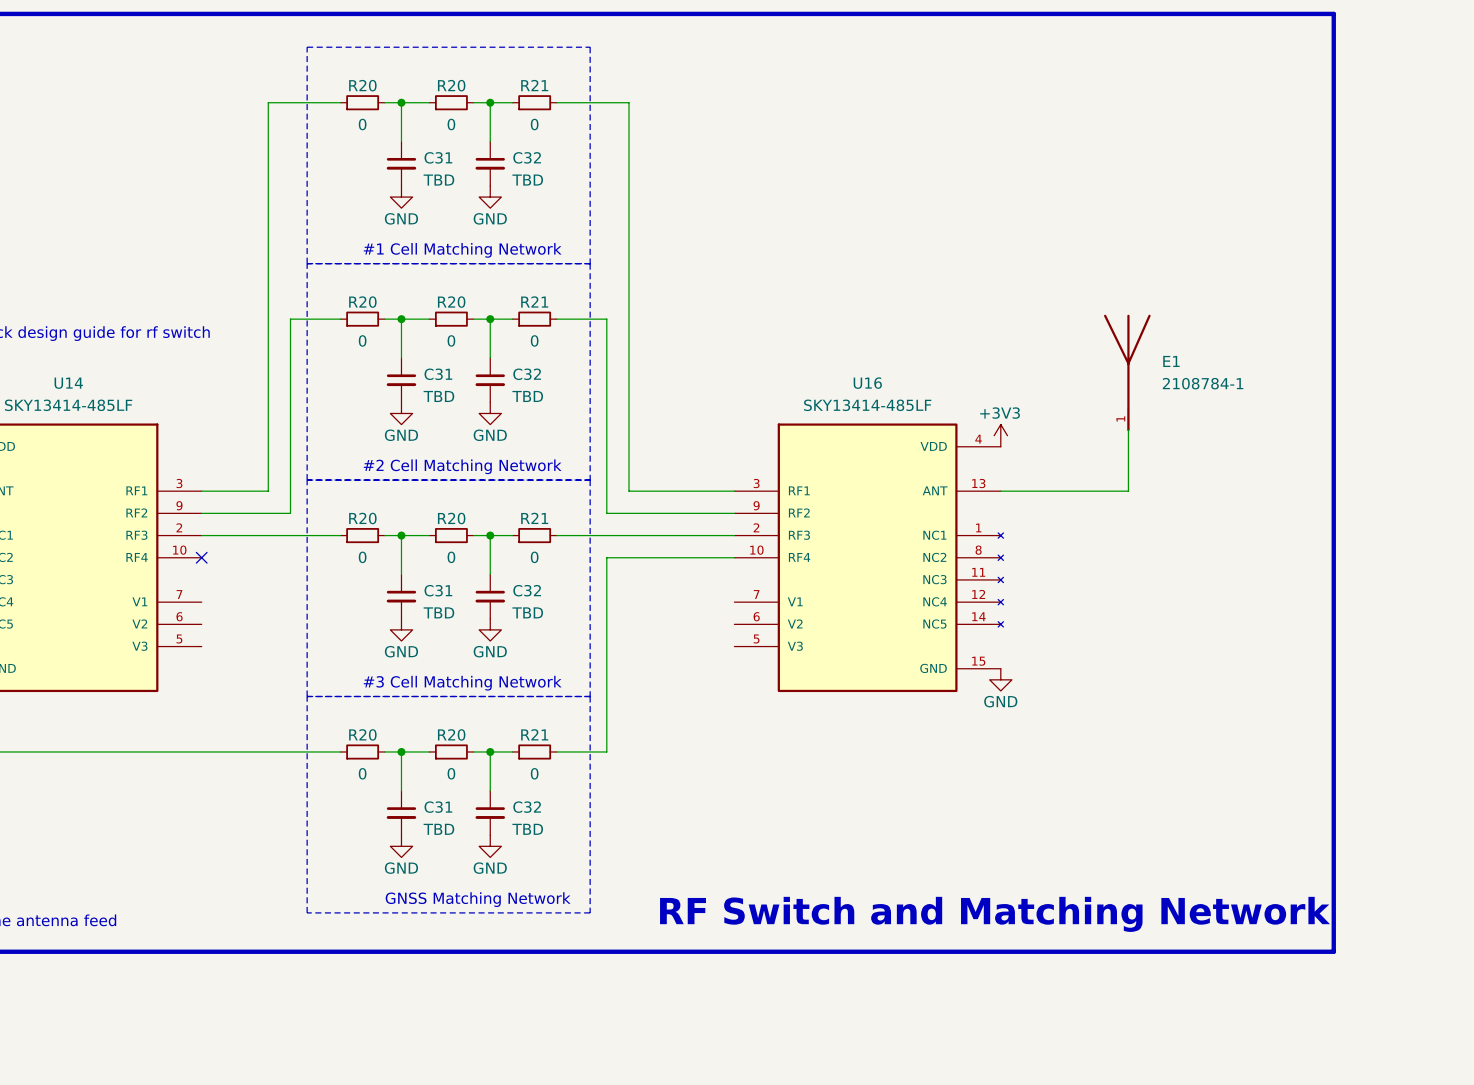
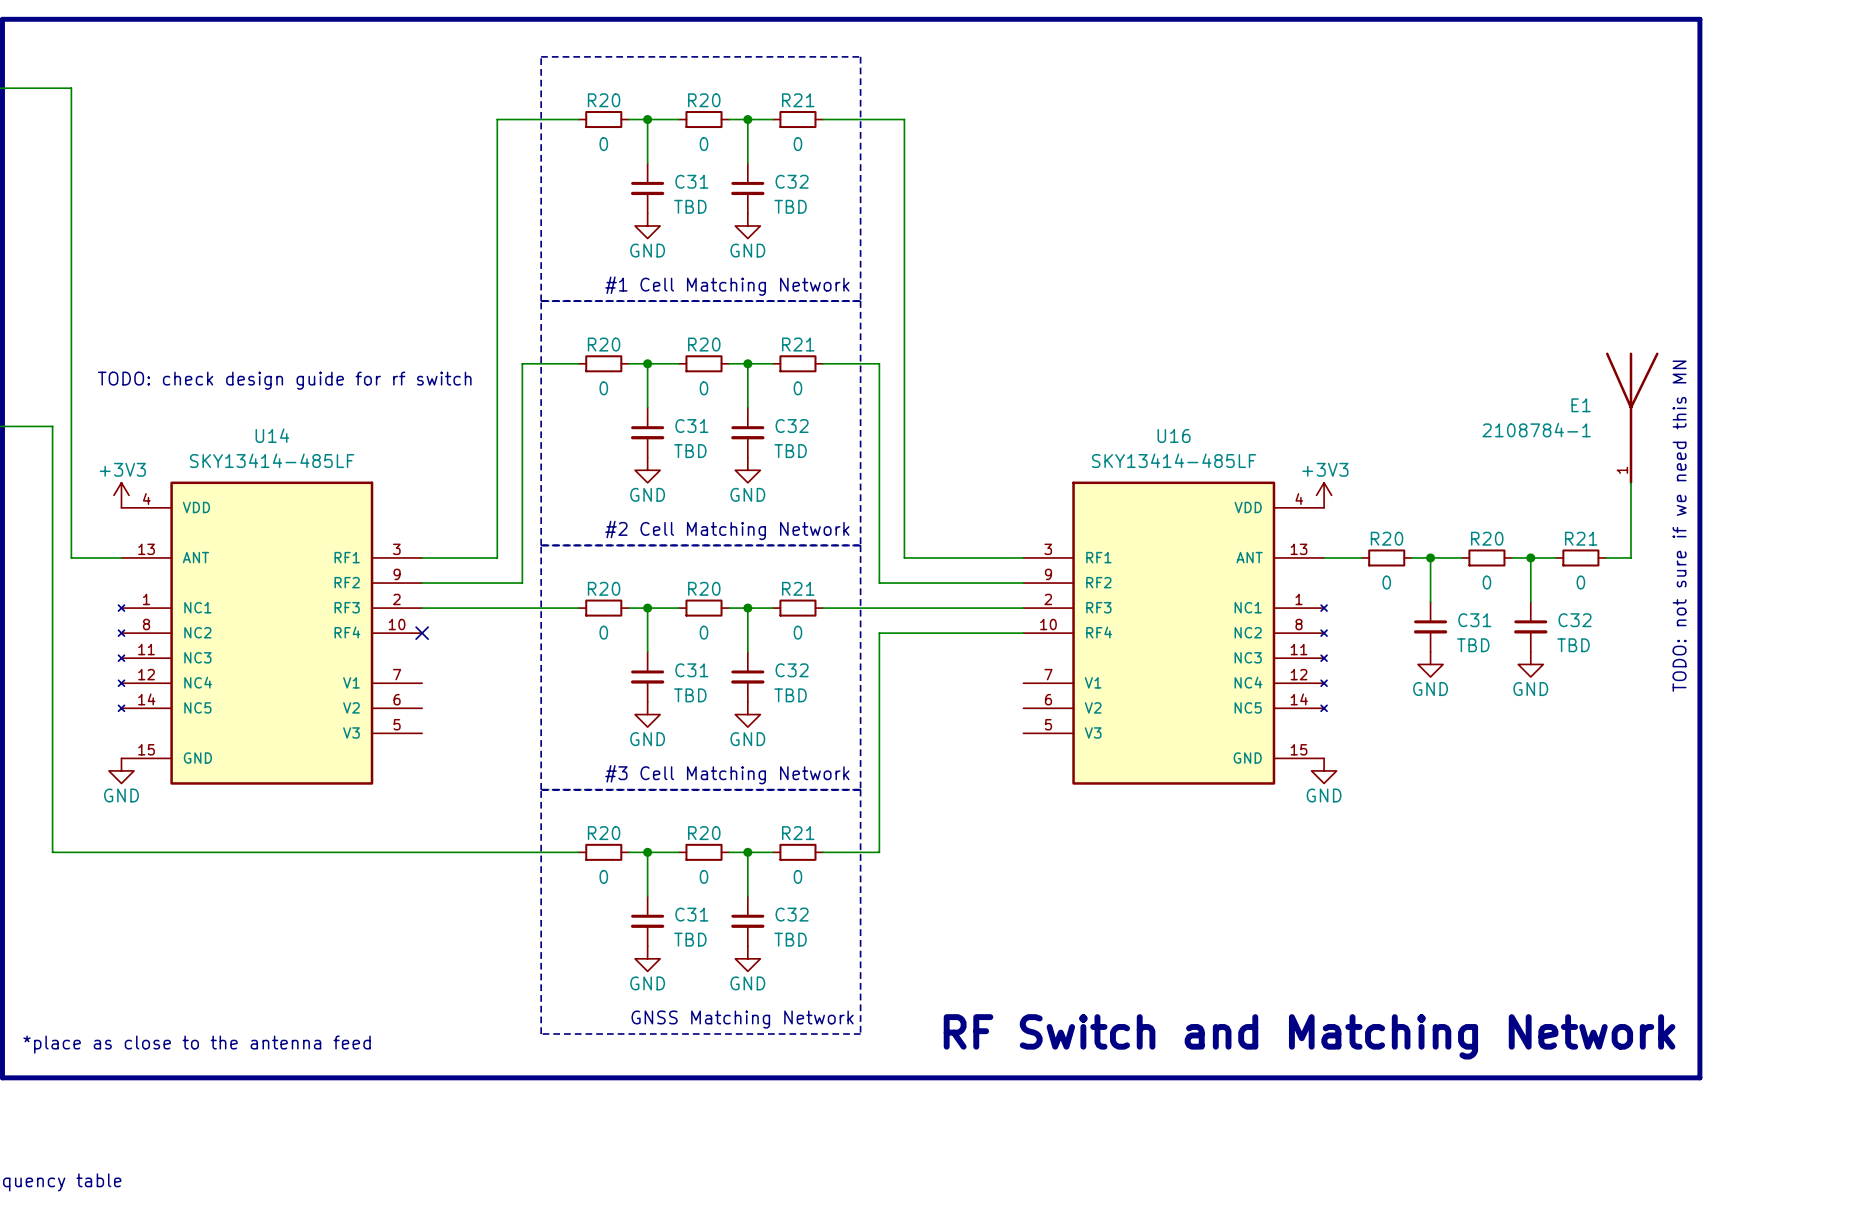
E1 flip: as is (1127, 372) -> left-right (1632, 418)
E1 position: (1127, 372) -> (1632, 418)
wire: none -> (1630, 482) (1630, 557) (1605, 557)
wire: (1128, 430) (1128, 491) (1122, 491) -> none
text: none -> TODO: not sure if we need this MN (1679, 526)
wire: (1034, 491) (1078, 491) -> none
R20: none -> 0 (1386, 557)
wire: none -> (1430, 557) (1430, 601)
junction: none -> (1430, 557)
R20: none -> 0 (1486, 557)
wire: none -> (1511, 557) (1555, 557)
wire: none -> (1530, 557) (1530, 601)
junction: none -> (1530, 557)
R21: none -> 0 (1580, 557)
C31: none -> TBD (1430, 626)
C32: none -> TBD (1530, 626)
power symbol: none -> GND (1430, 664)
power symbol: none -> GND (1530, 664)

